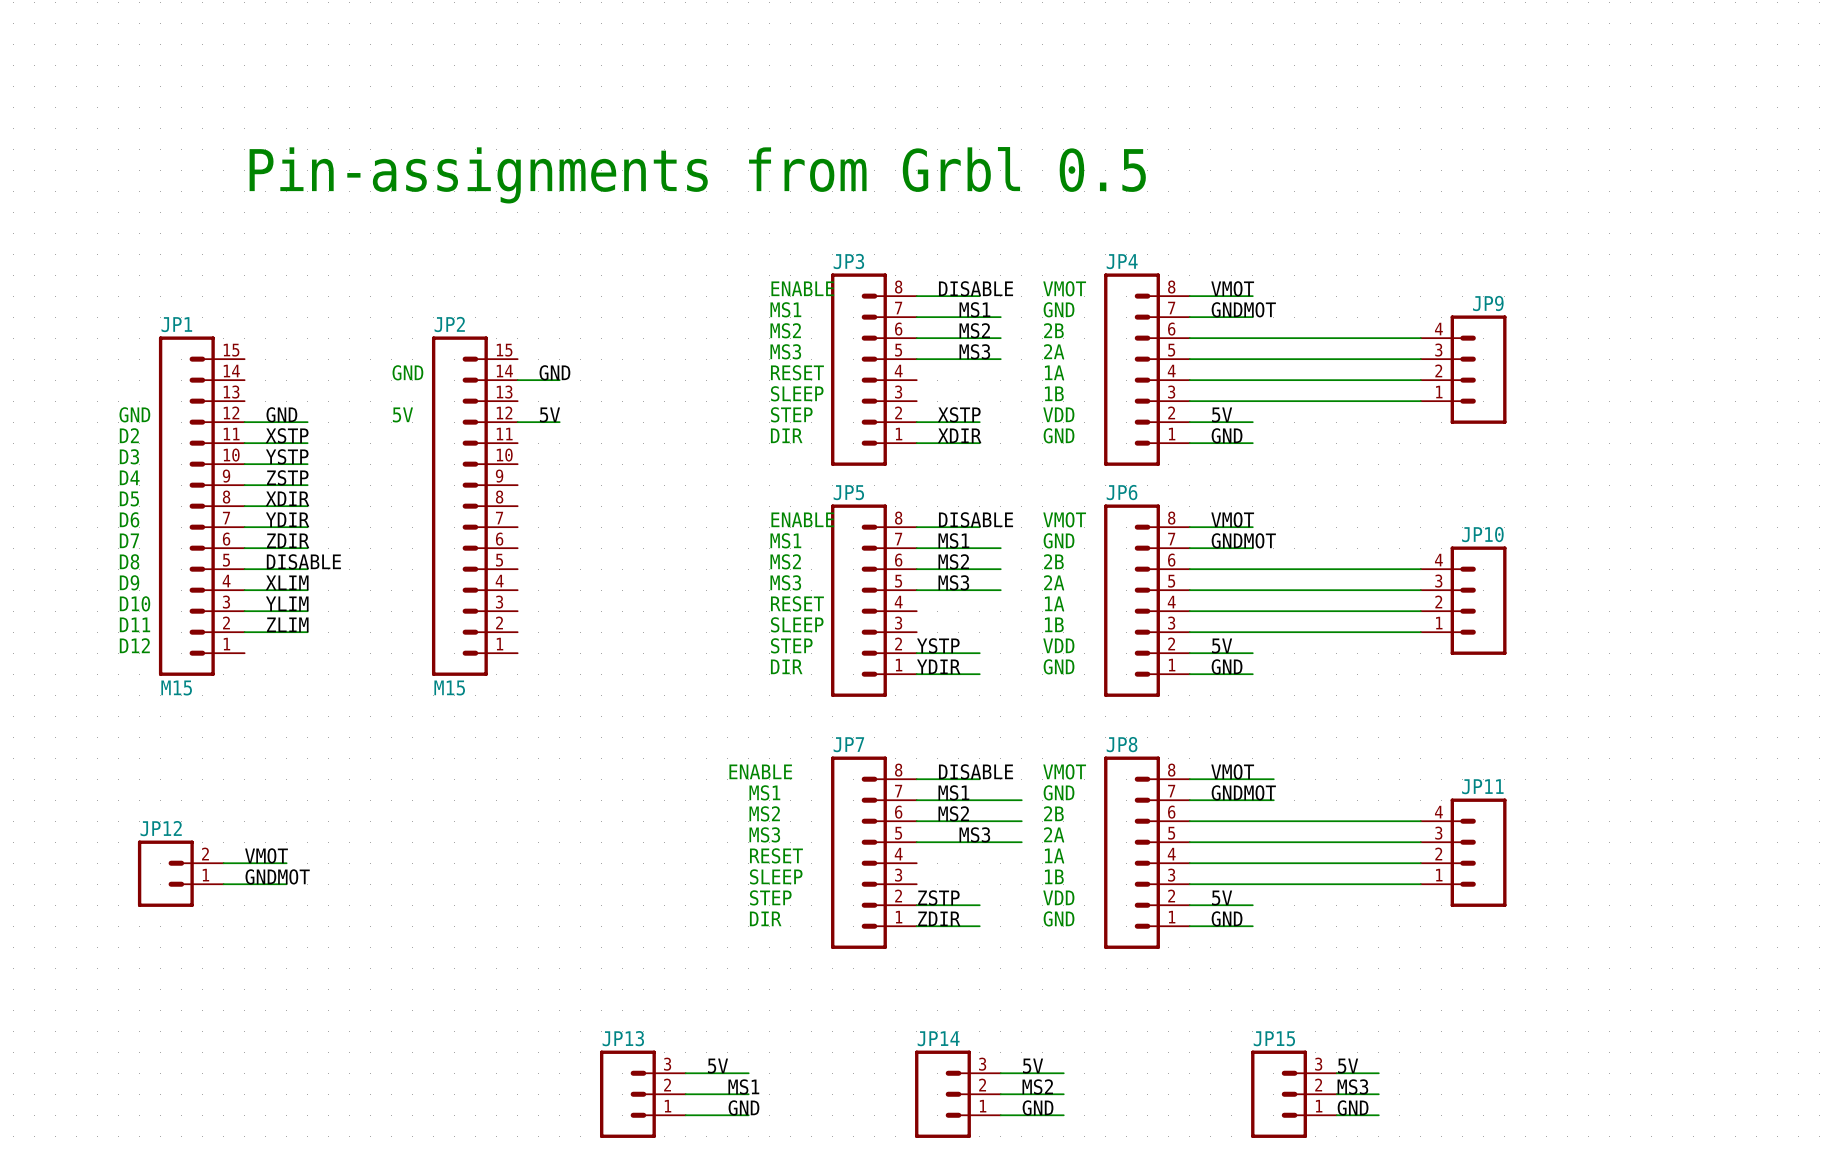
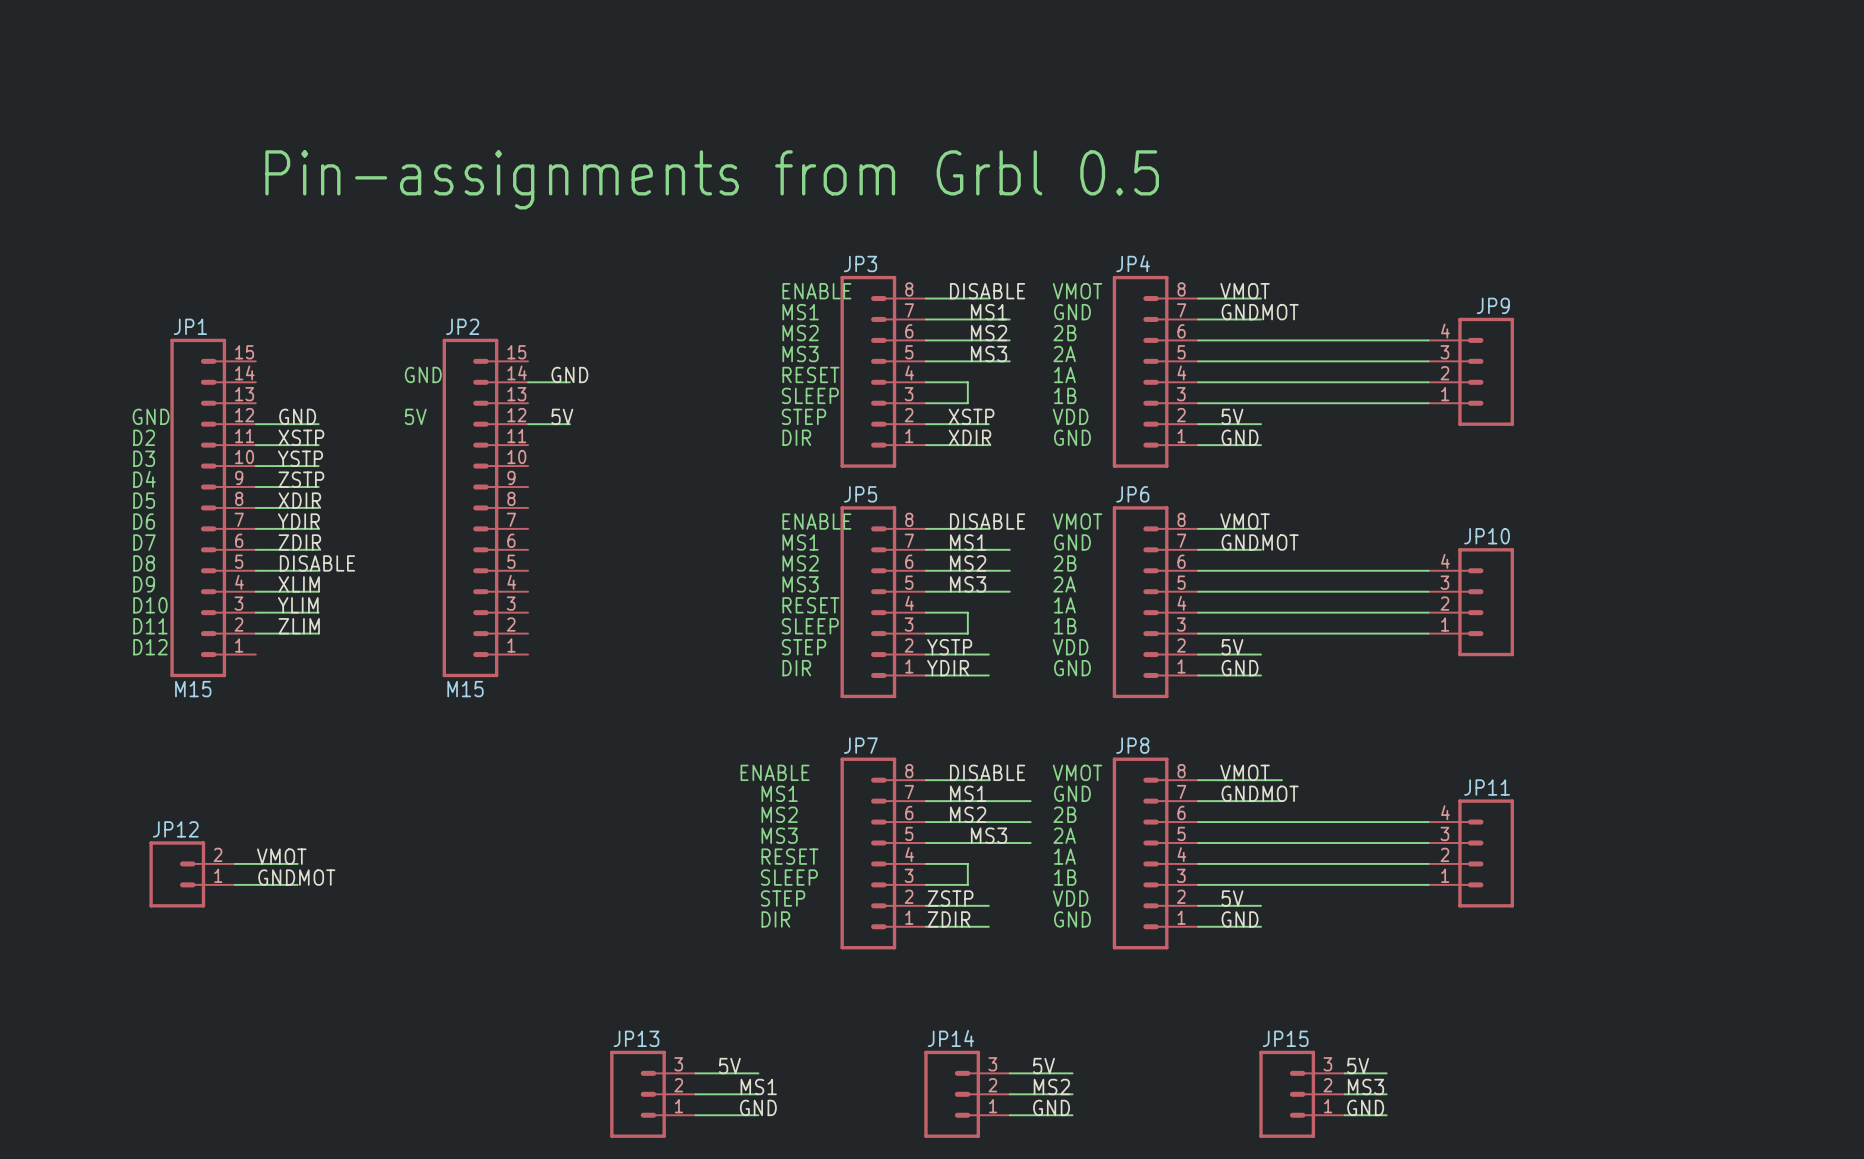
wire: none -> (925, 382) (967, 382) (967, 403) (925, 403)
wire: none -> (925, 612) (967, 612) (967, 633) (925, 633)
wire: none -> (925, 863) (967, 863) (967, 884) (925, 884)

